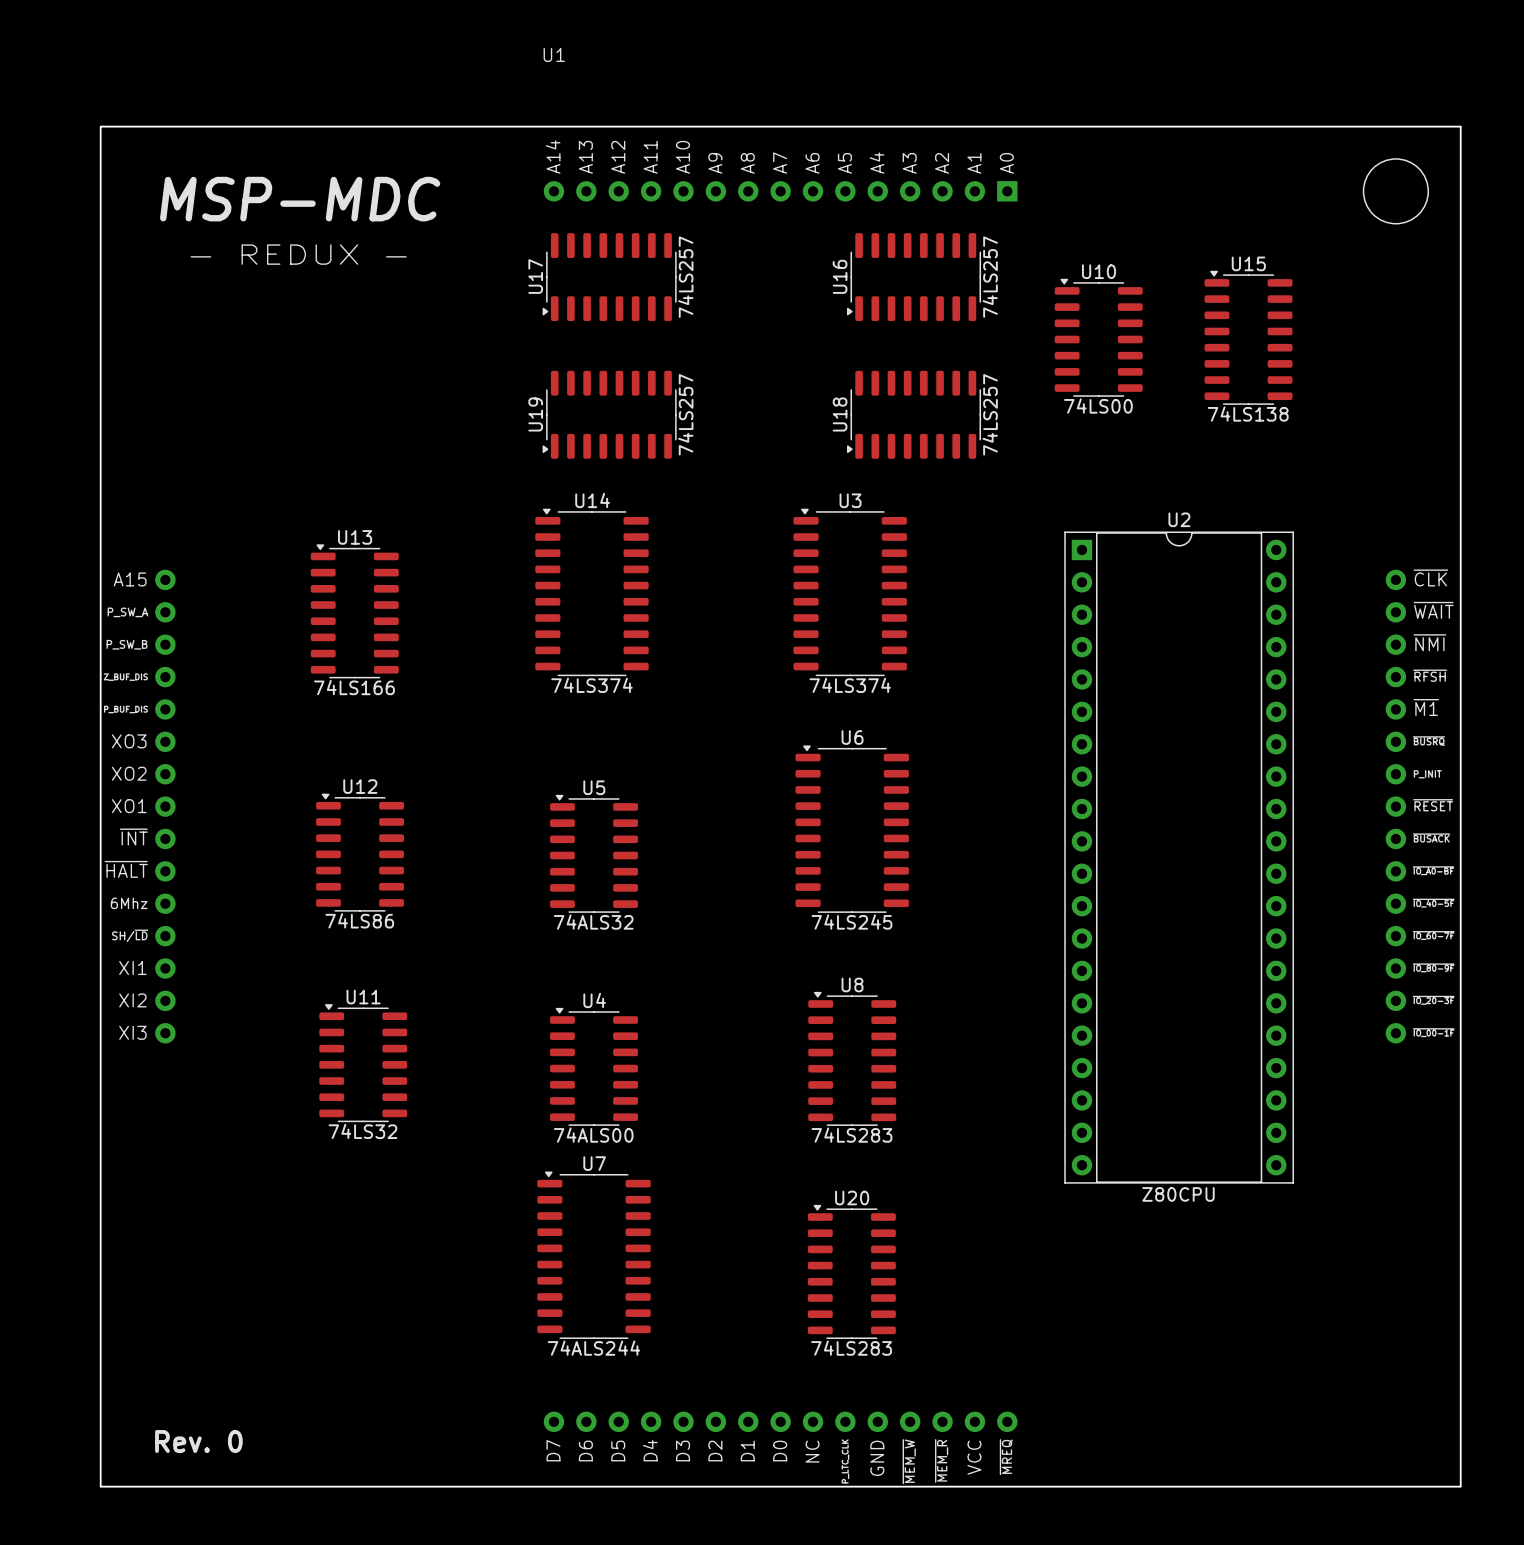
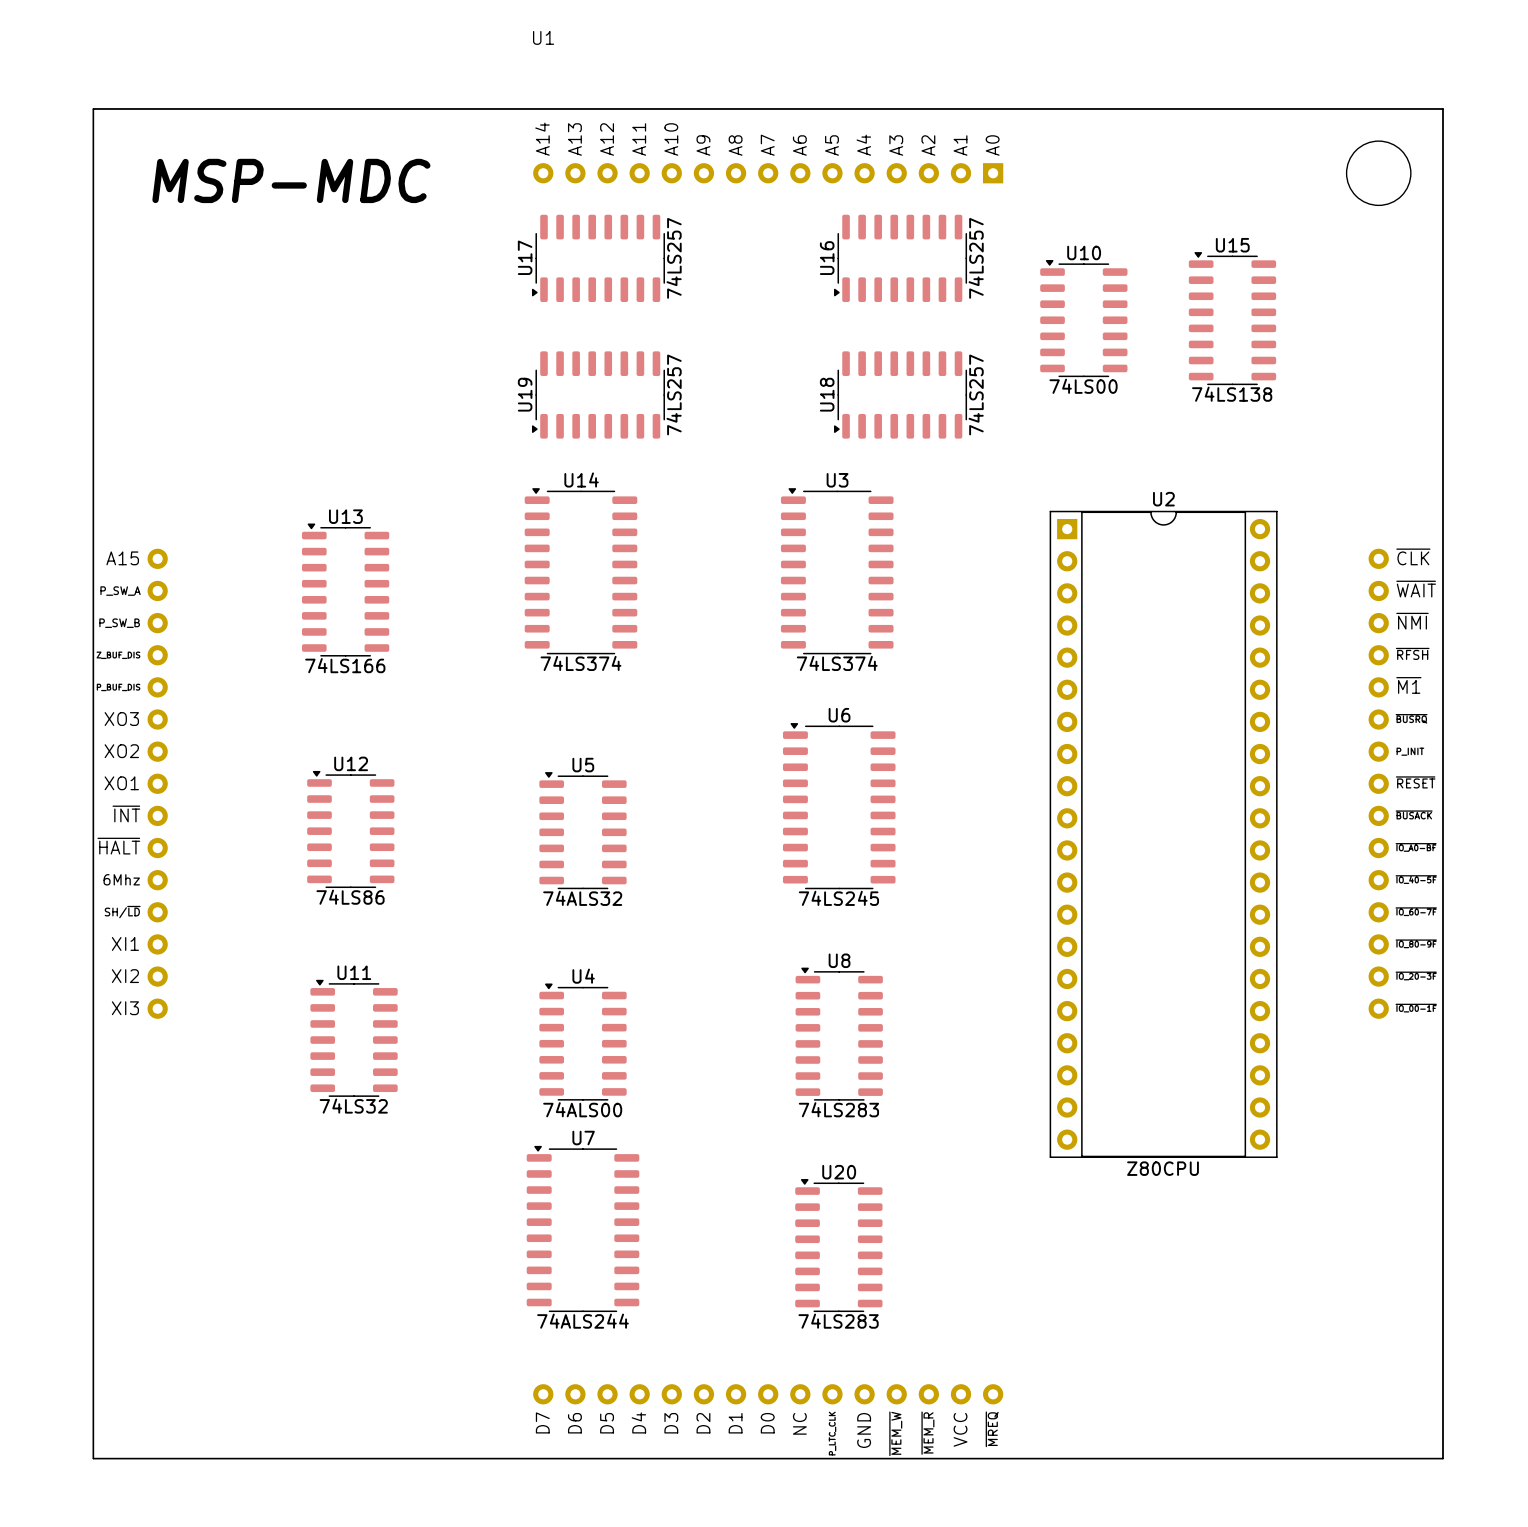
text: - REDUX - (298, 254) -> none
text: Rev. 0 (198, 1441) -> none

